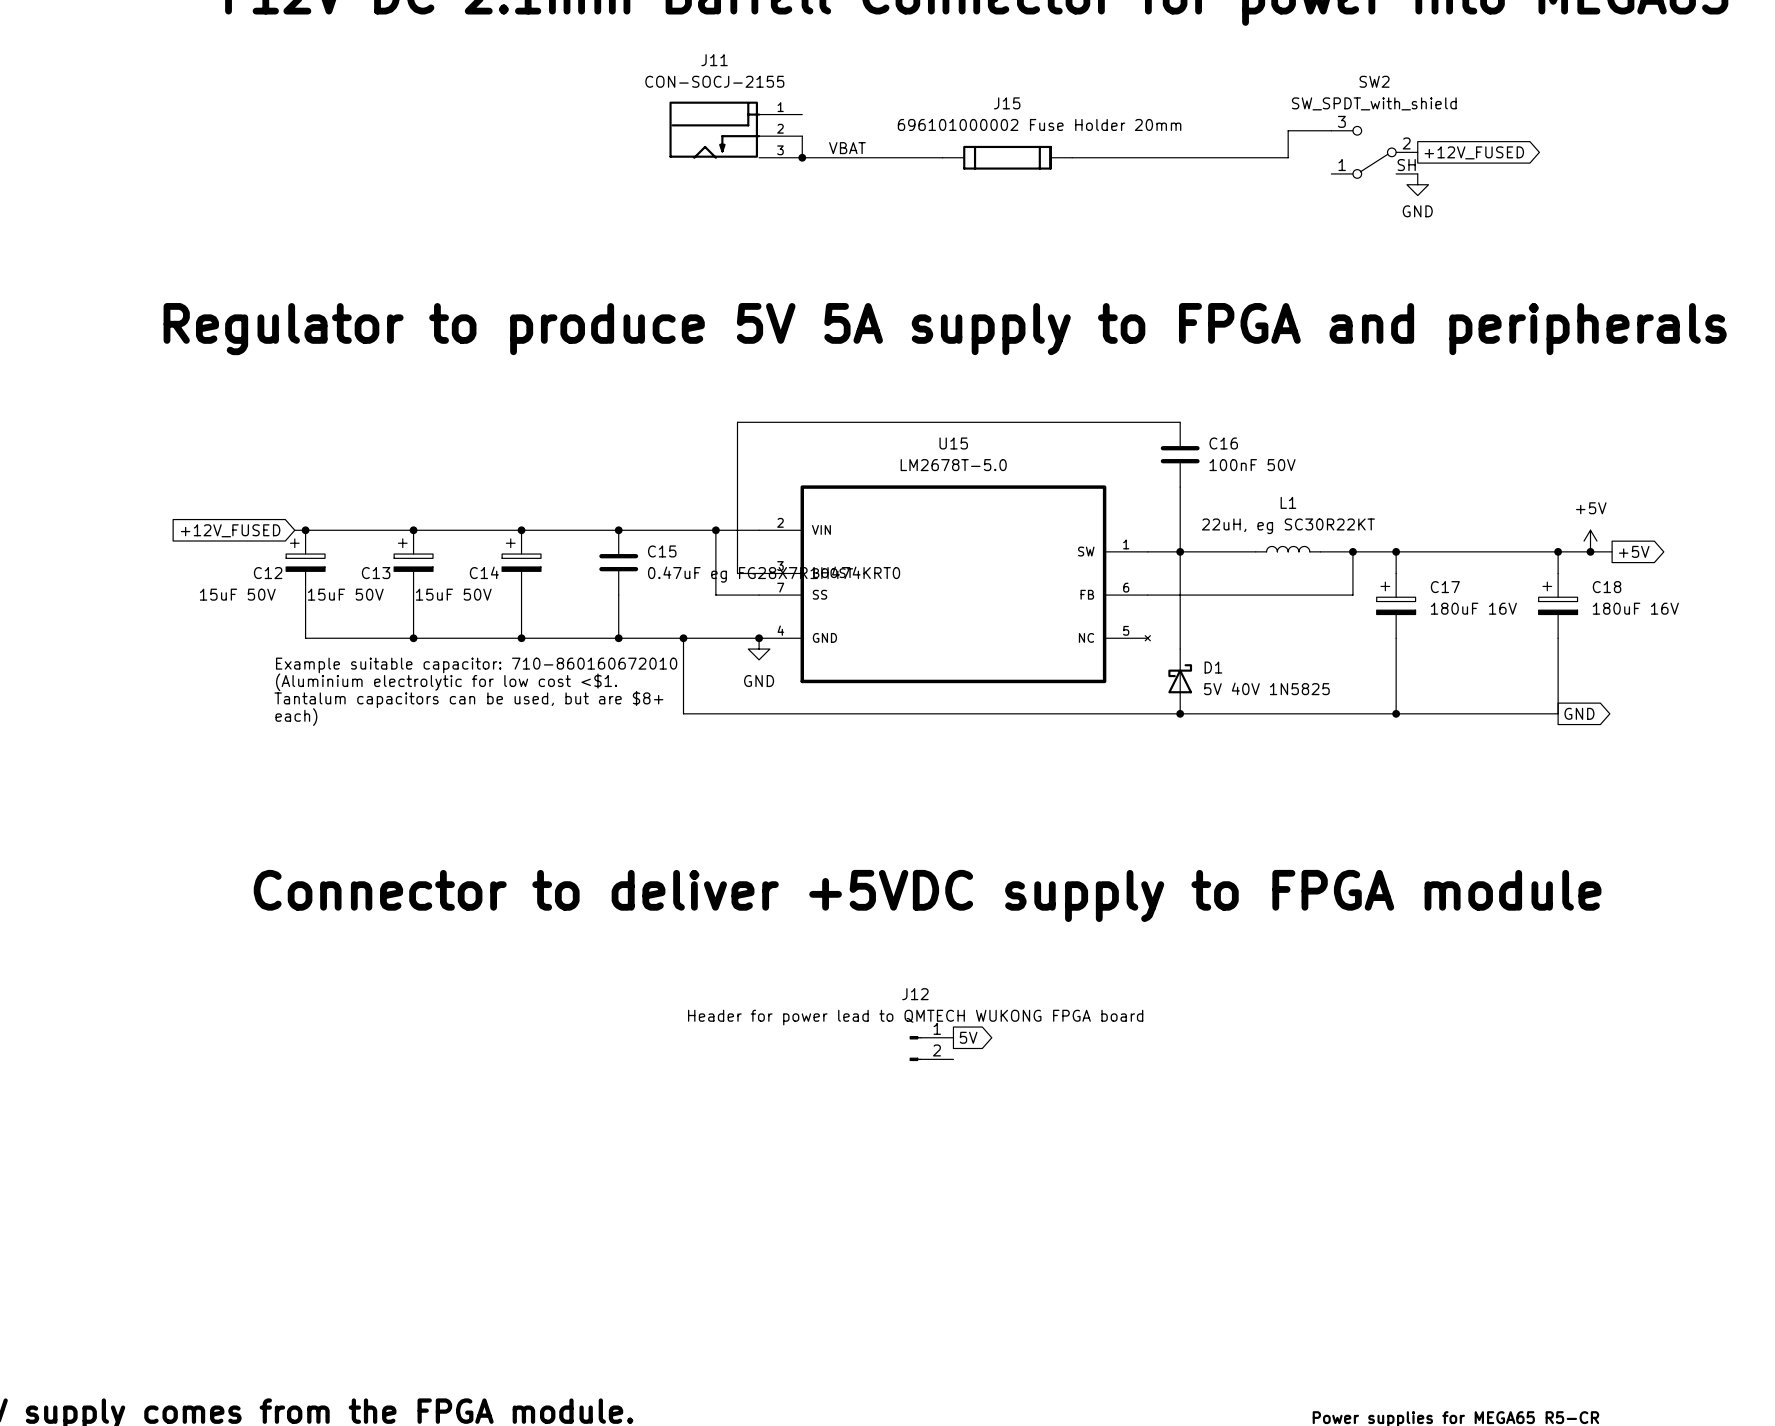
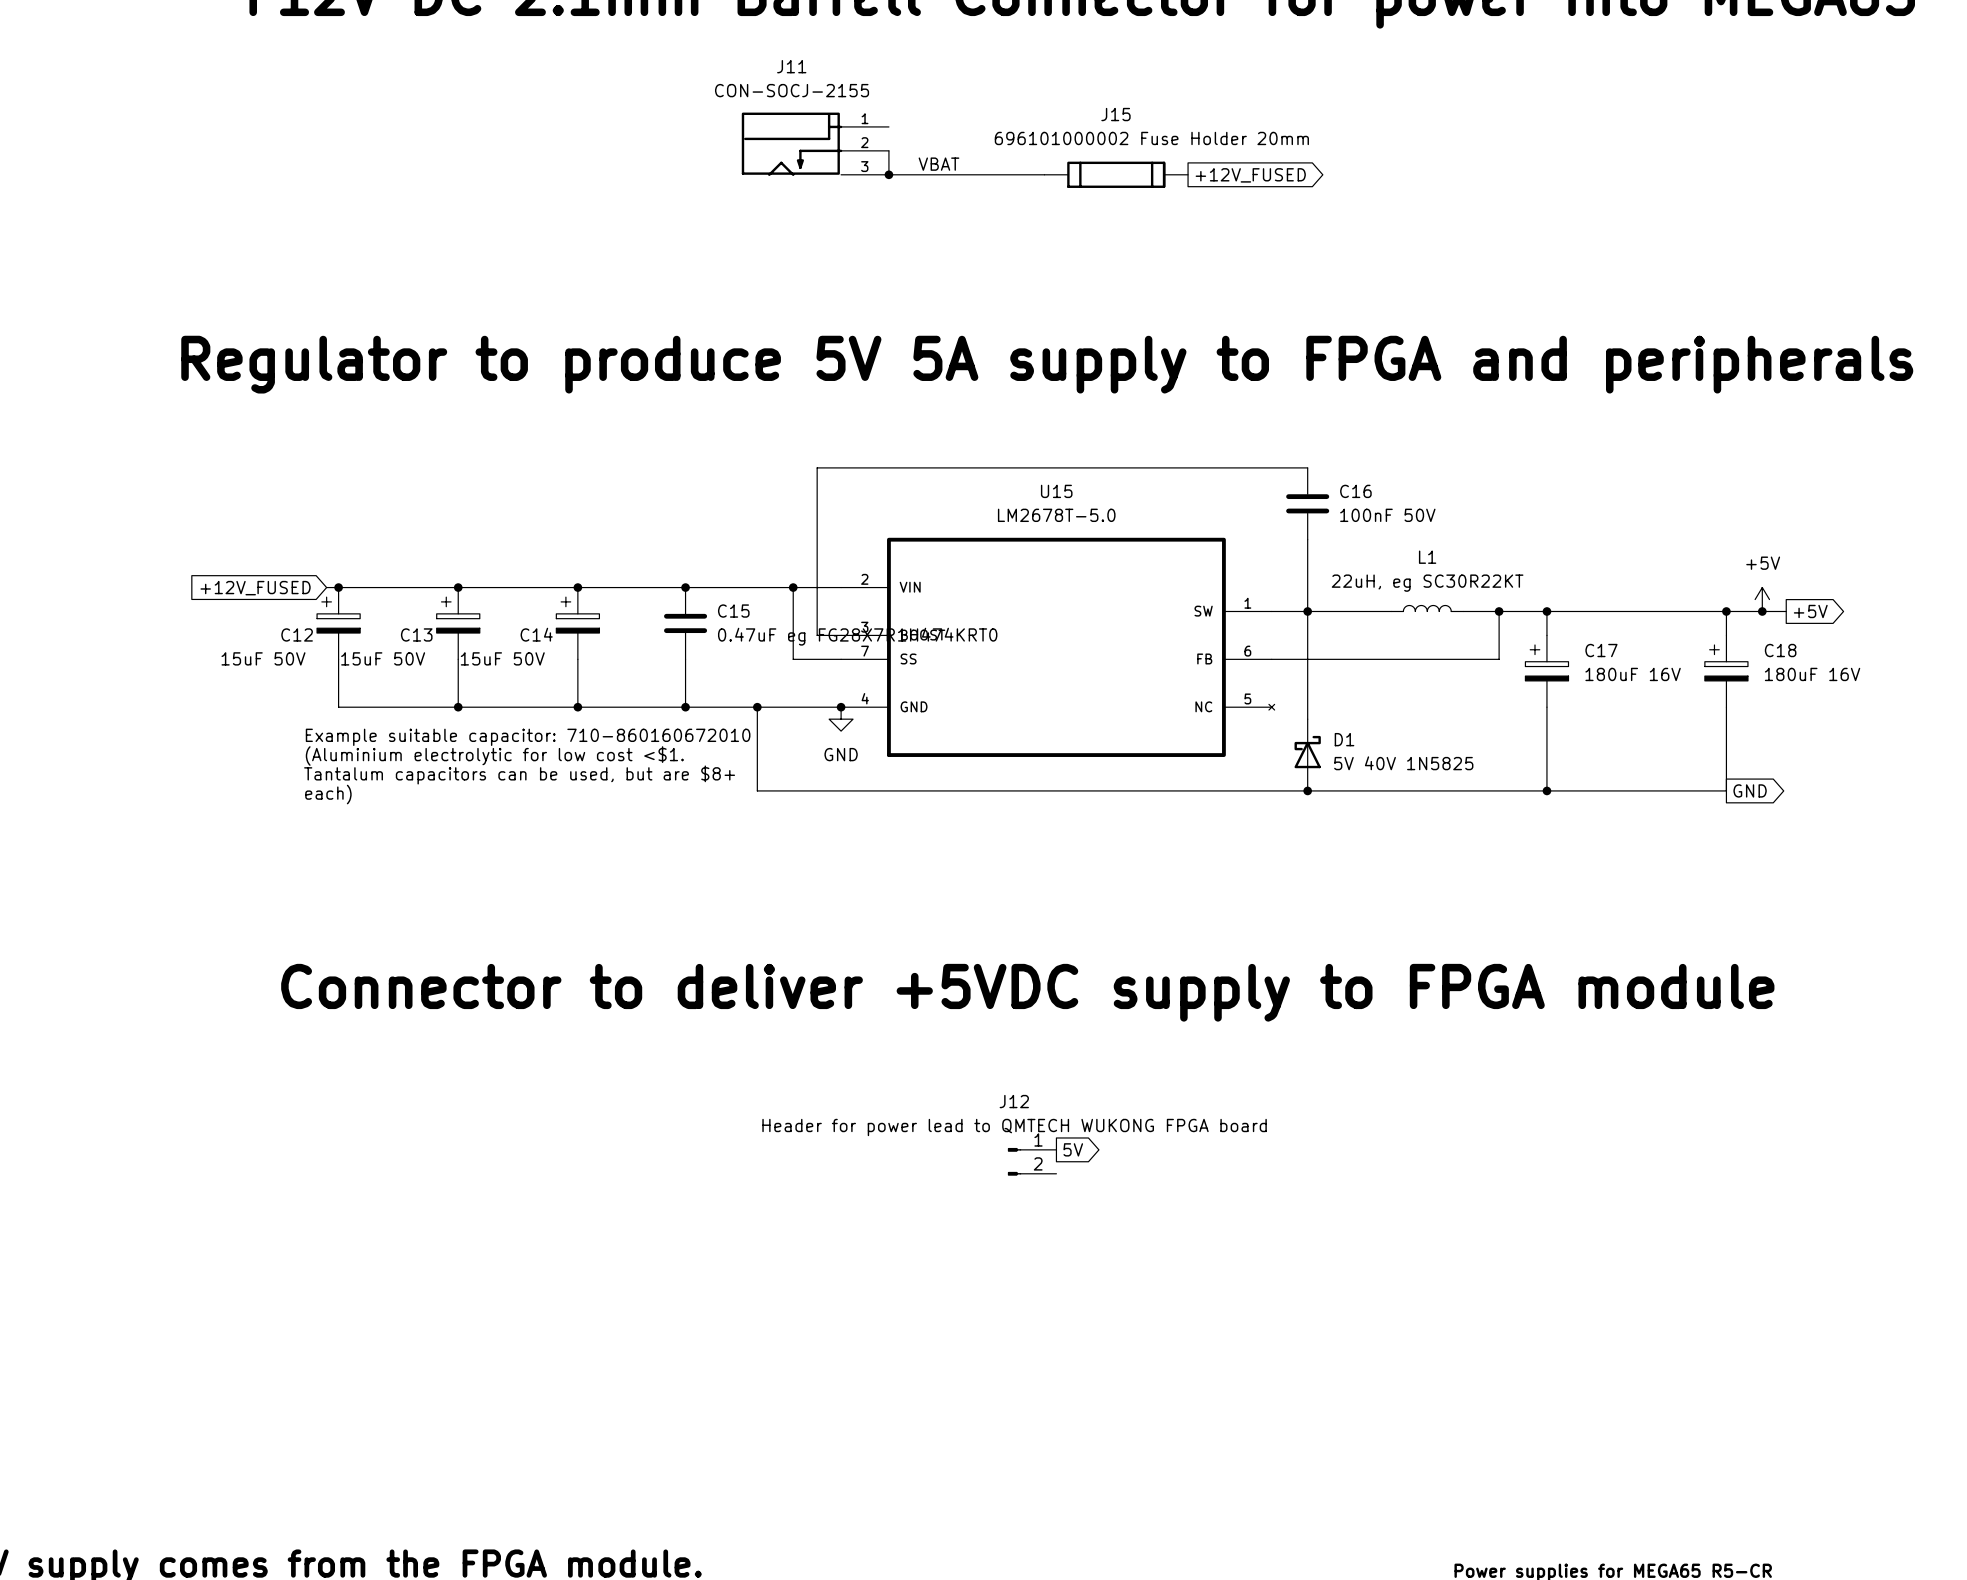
wire: (1331, 130) (1288, 130) (1288, 157) (1072, 157) -> none
SW2: SW_SPDT_with_shield (1374, 152) -> none
global label: +12V_FUSED (1474, 152) -> none
global label: none -> +12V_FUSED (1250, 175)
power symbol: GND (1417, 184) -> none

